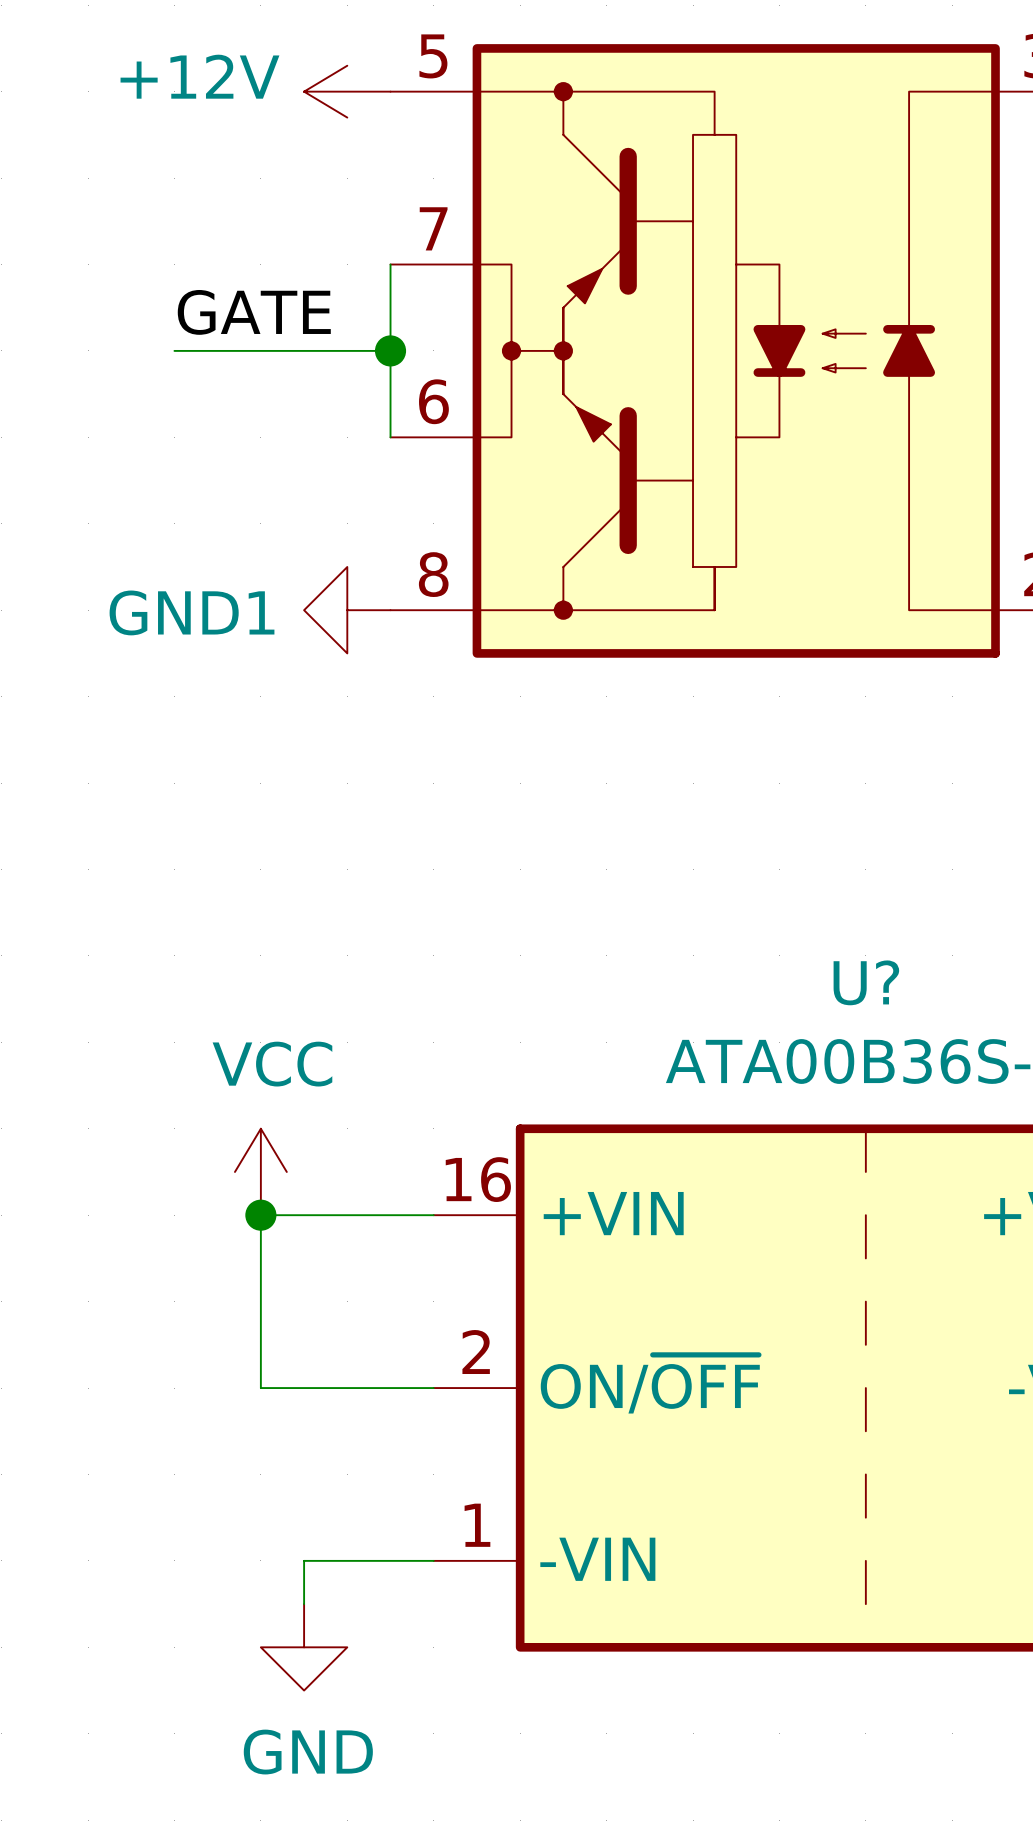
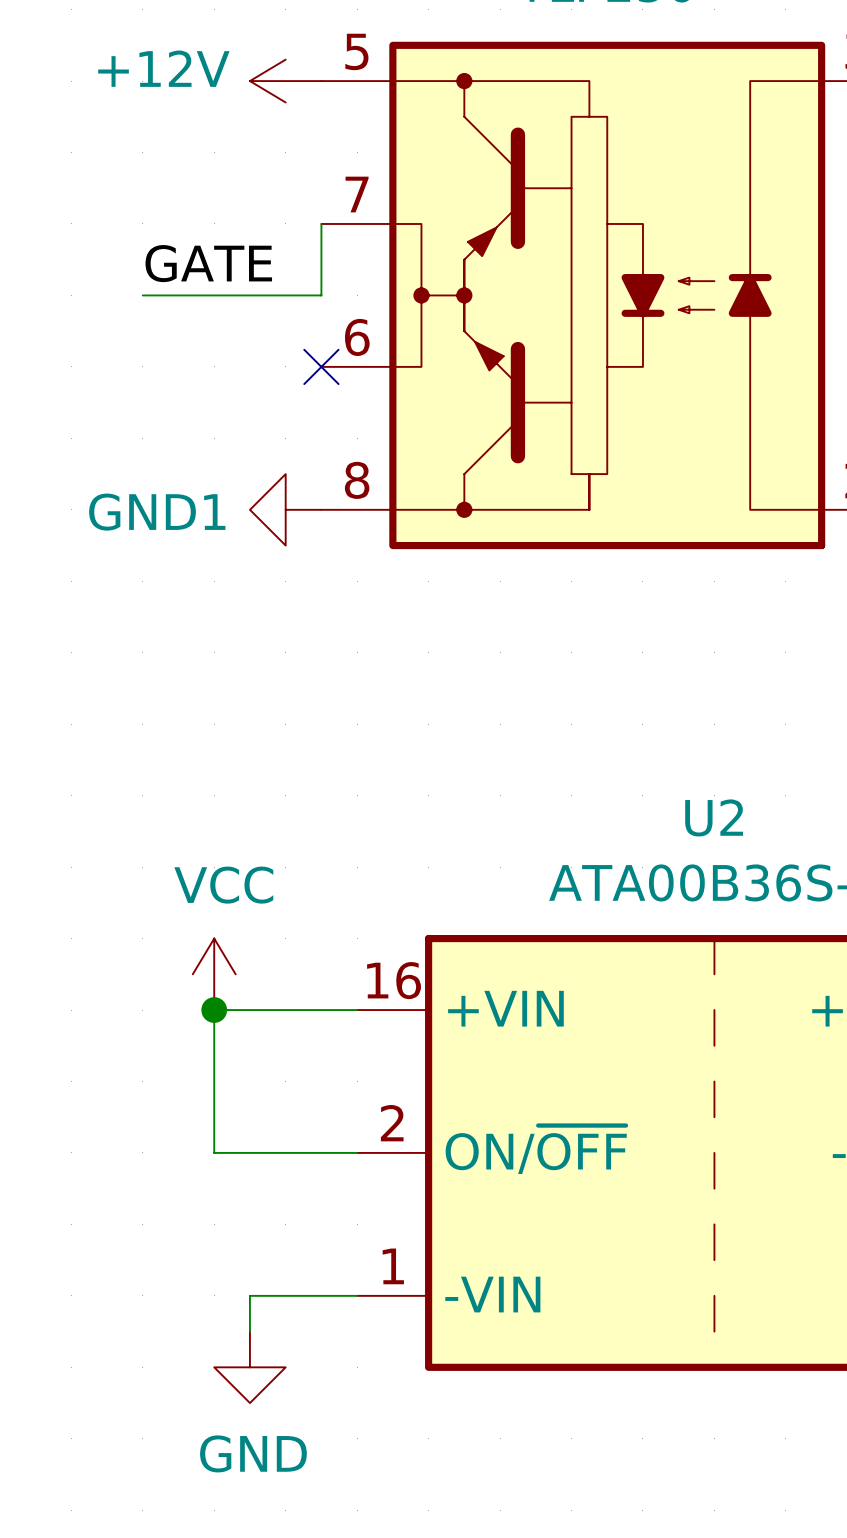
wire: (390, 350) (390, 437) -> none
junction: (390, 350) -> none
no-connect mark: none -> (321, 366)
U? name: U? (866, 982) -> U2 (714, 817)

